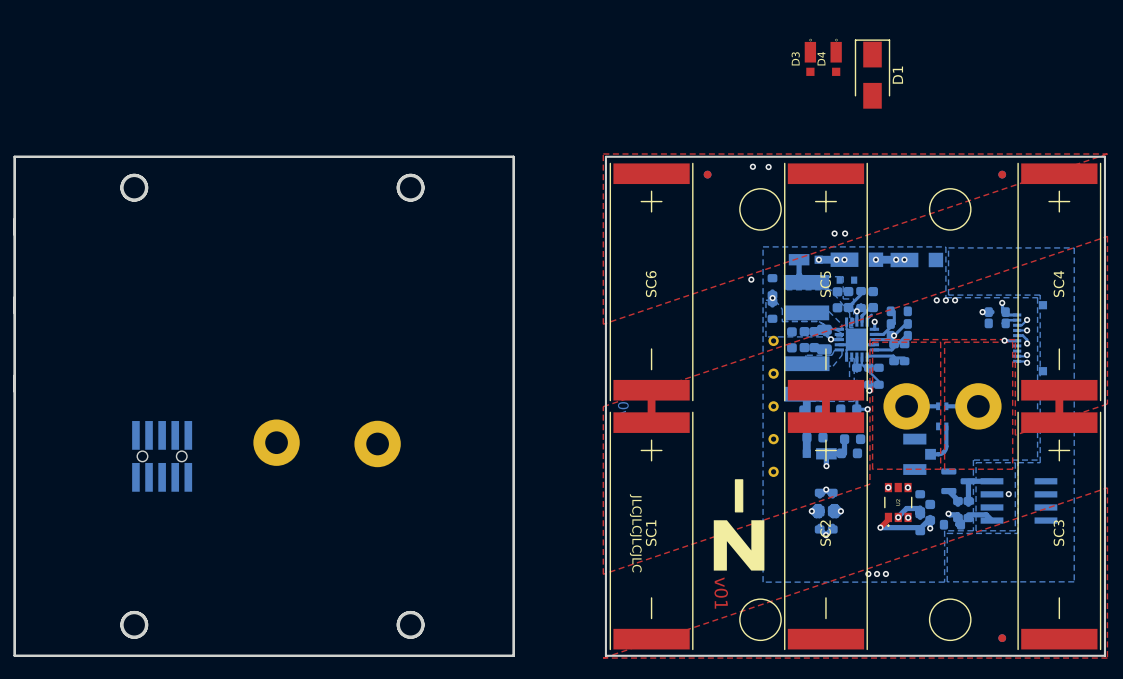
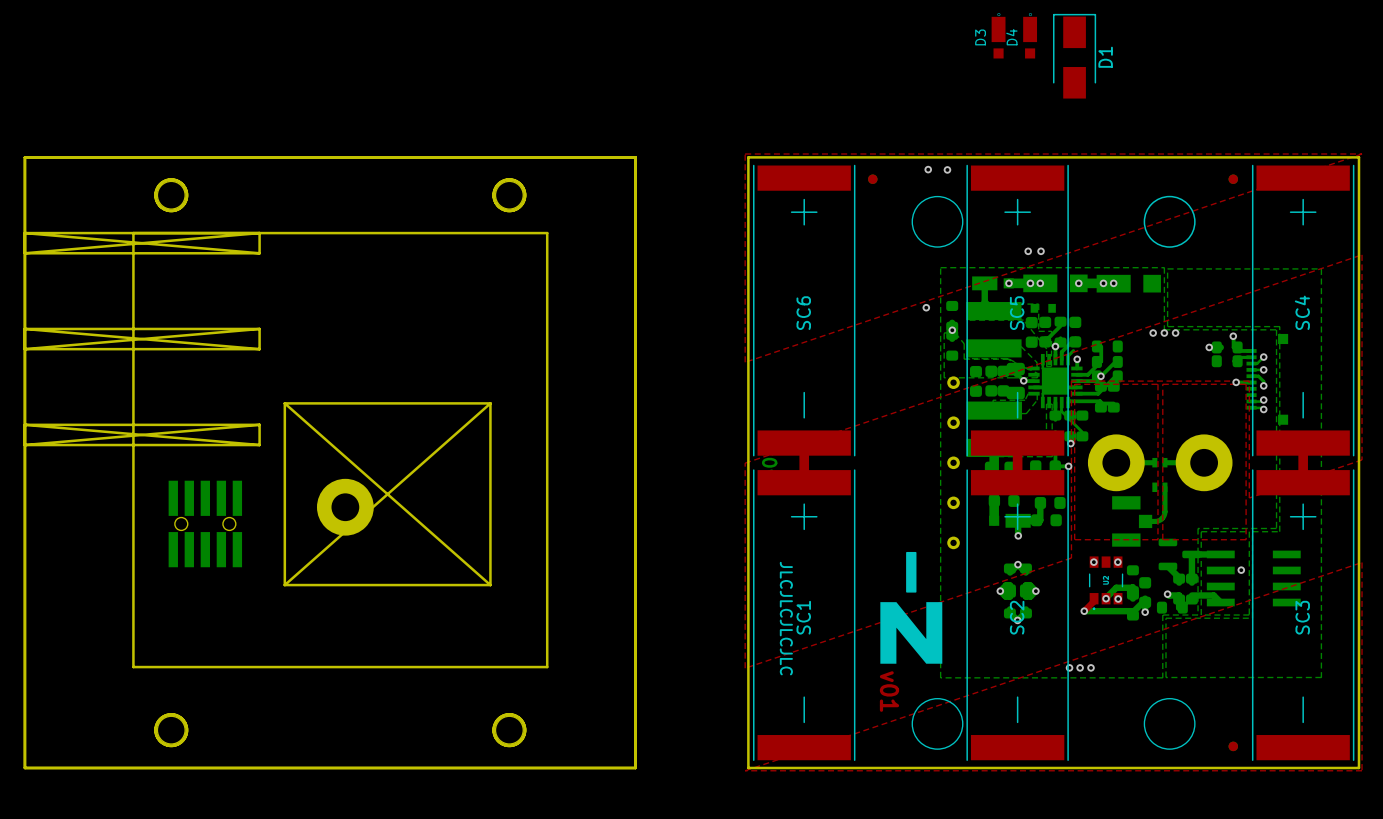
board edge: none -> (133, 233) (133, 667) (547, 667) (547, 233) (24, 233) (259, 253)
board edge: none -> (259, 253) (259, 233) (24, 253) (259, 253)
board edge: none -> (259, 328) (259, 349)
board edge: none -> (259, 328) (24, 328) (259, 349)
board edge: none -> (259, 328) (24, 349) (259, 349)
board edge: none -> (284, 403) (284, 585)
board edge: none -> (284, 403) (490, 403)
board edge: none -> (284, 403) (490, 585)
board edge: none -> (490, 403) (490, 585)
board edge: none -> (490, 403) (284, 585)
board edge: none -> (259, 424) (259, 445)
board edge: none -> (259, 424) (24, 424) (259, 445)
board edge: none -> (259, 424) (24, 445) (259, 445)
part: (377, 443) -> none
board edge: none -> (284, 585) (490, 585)

